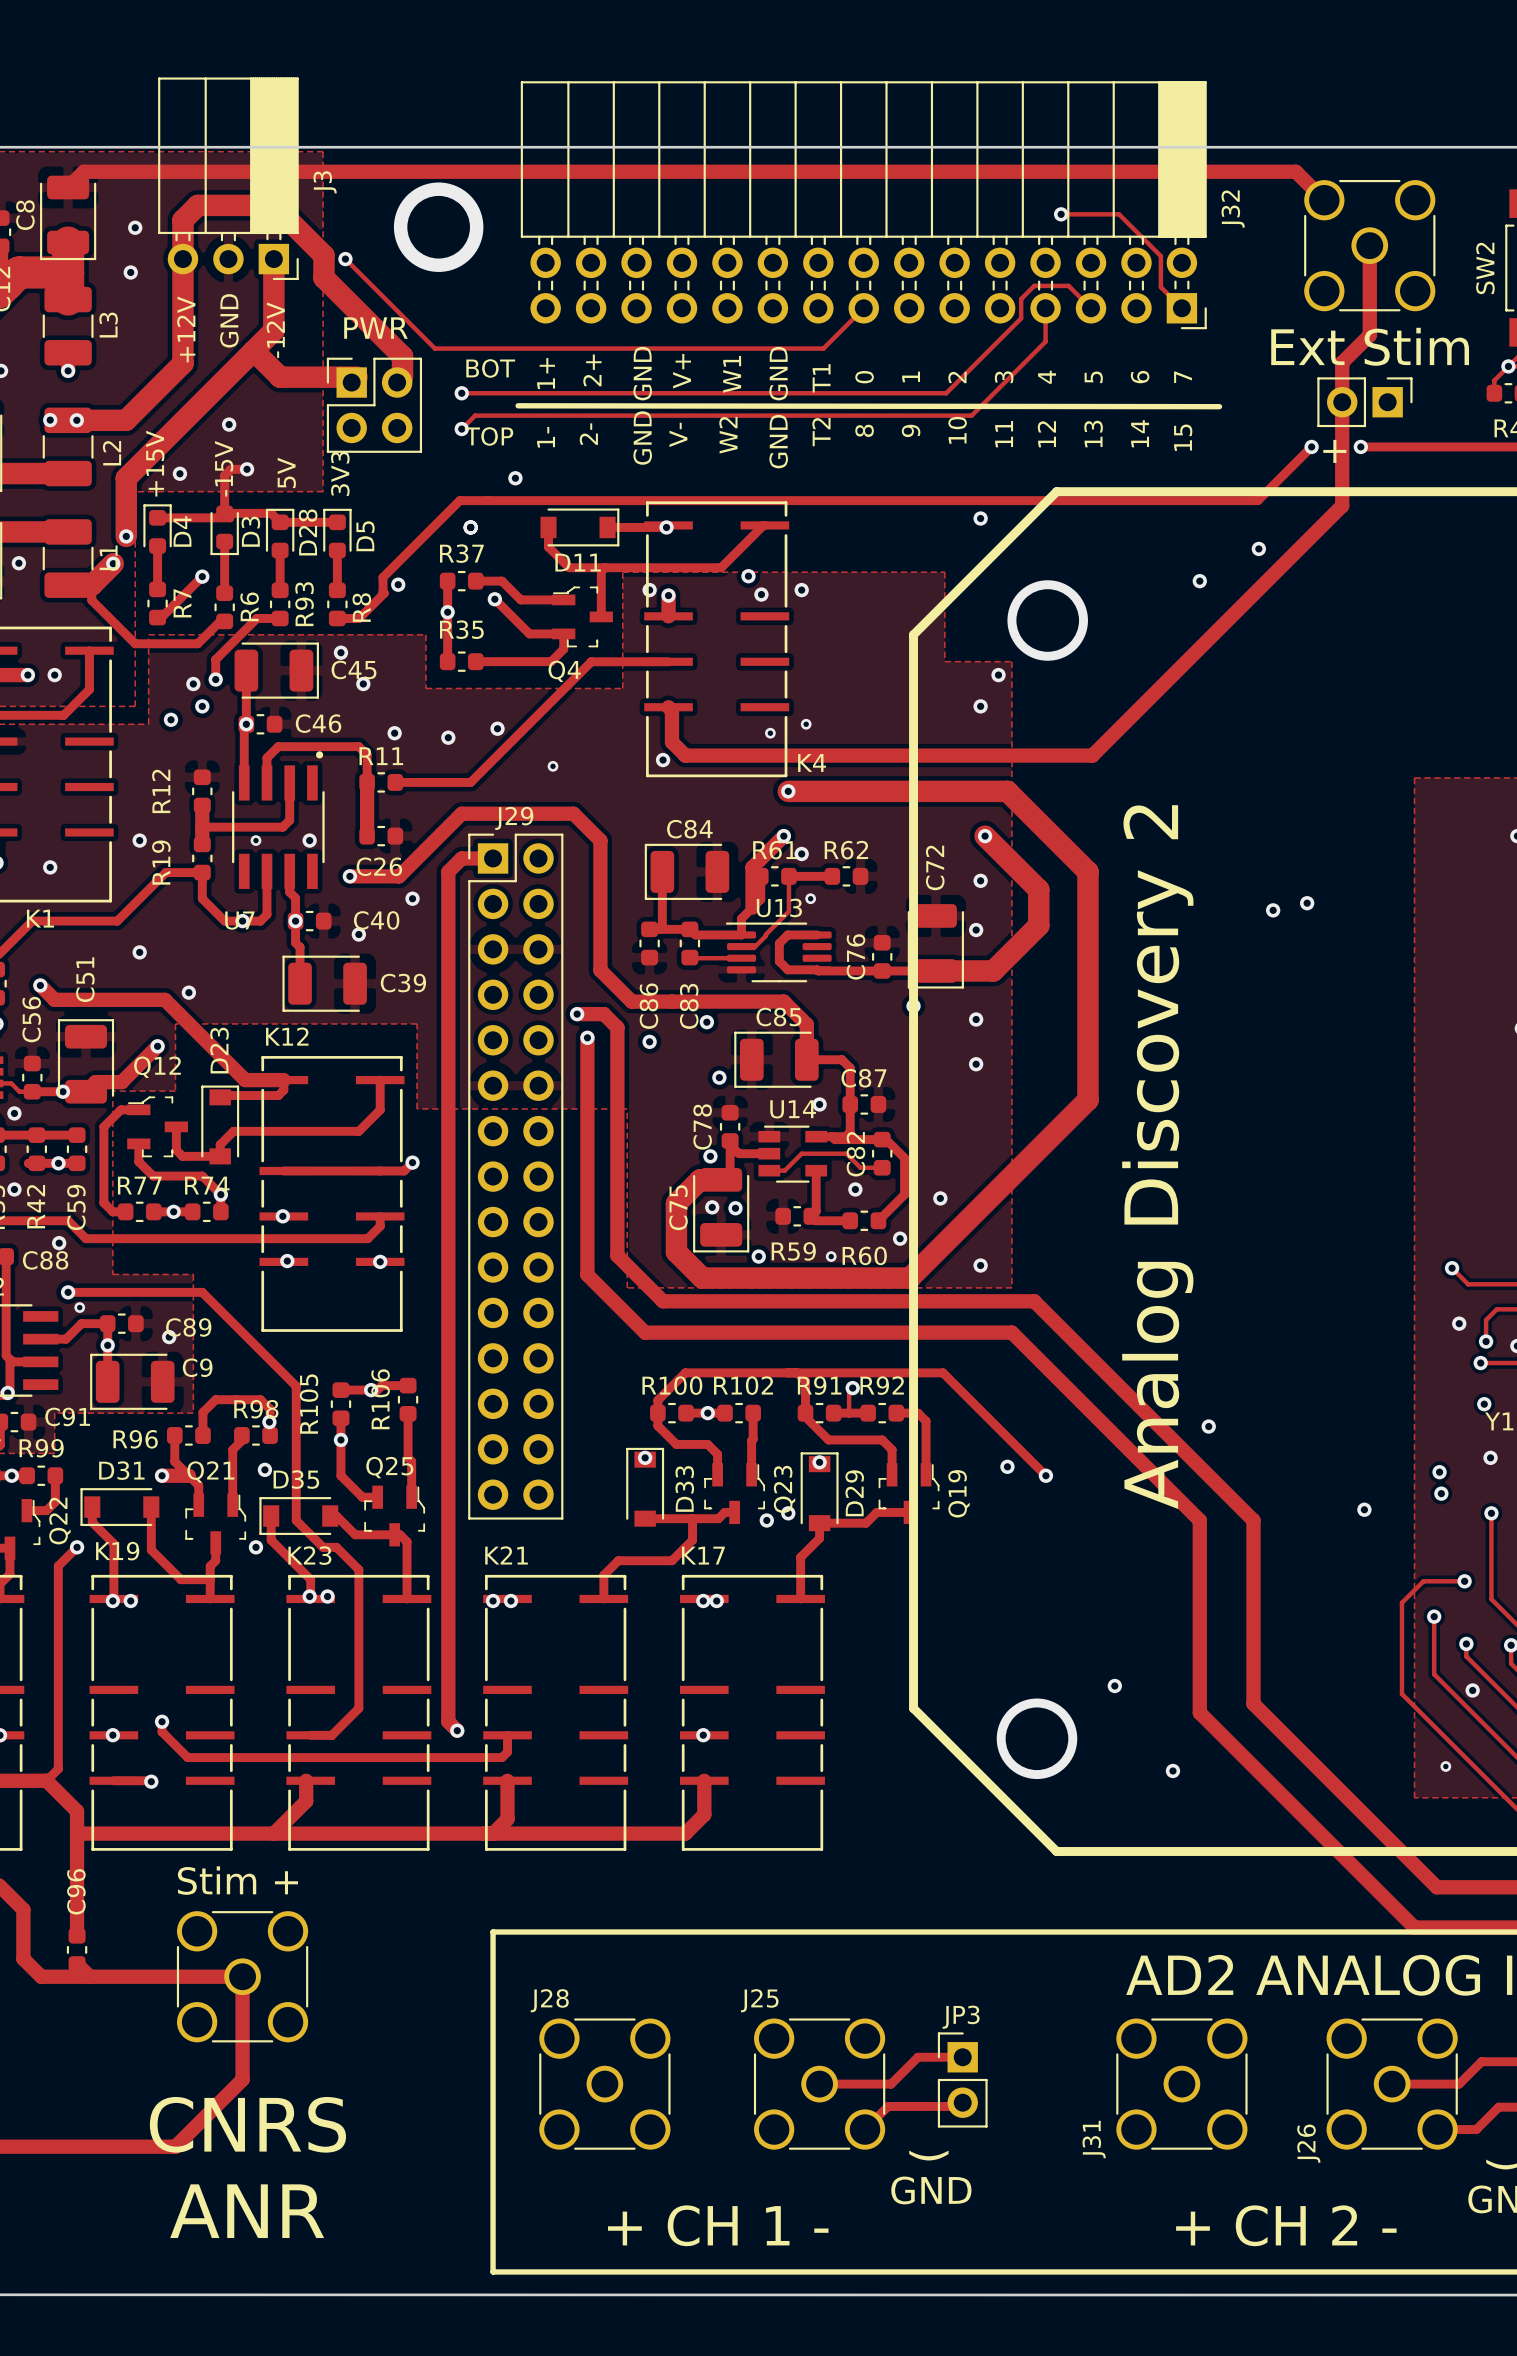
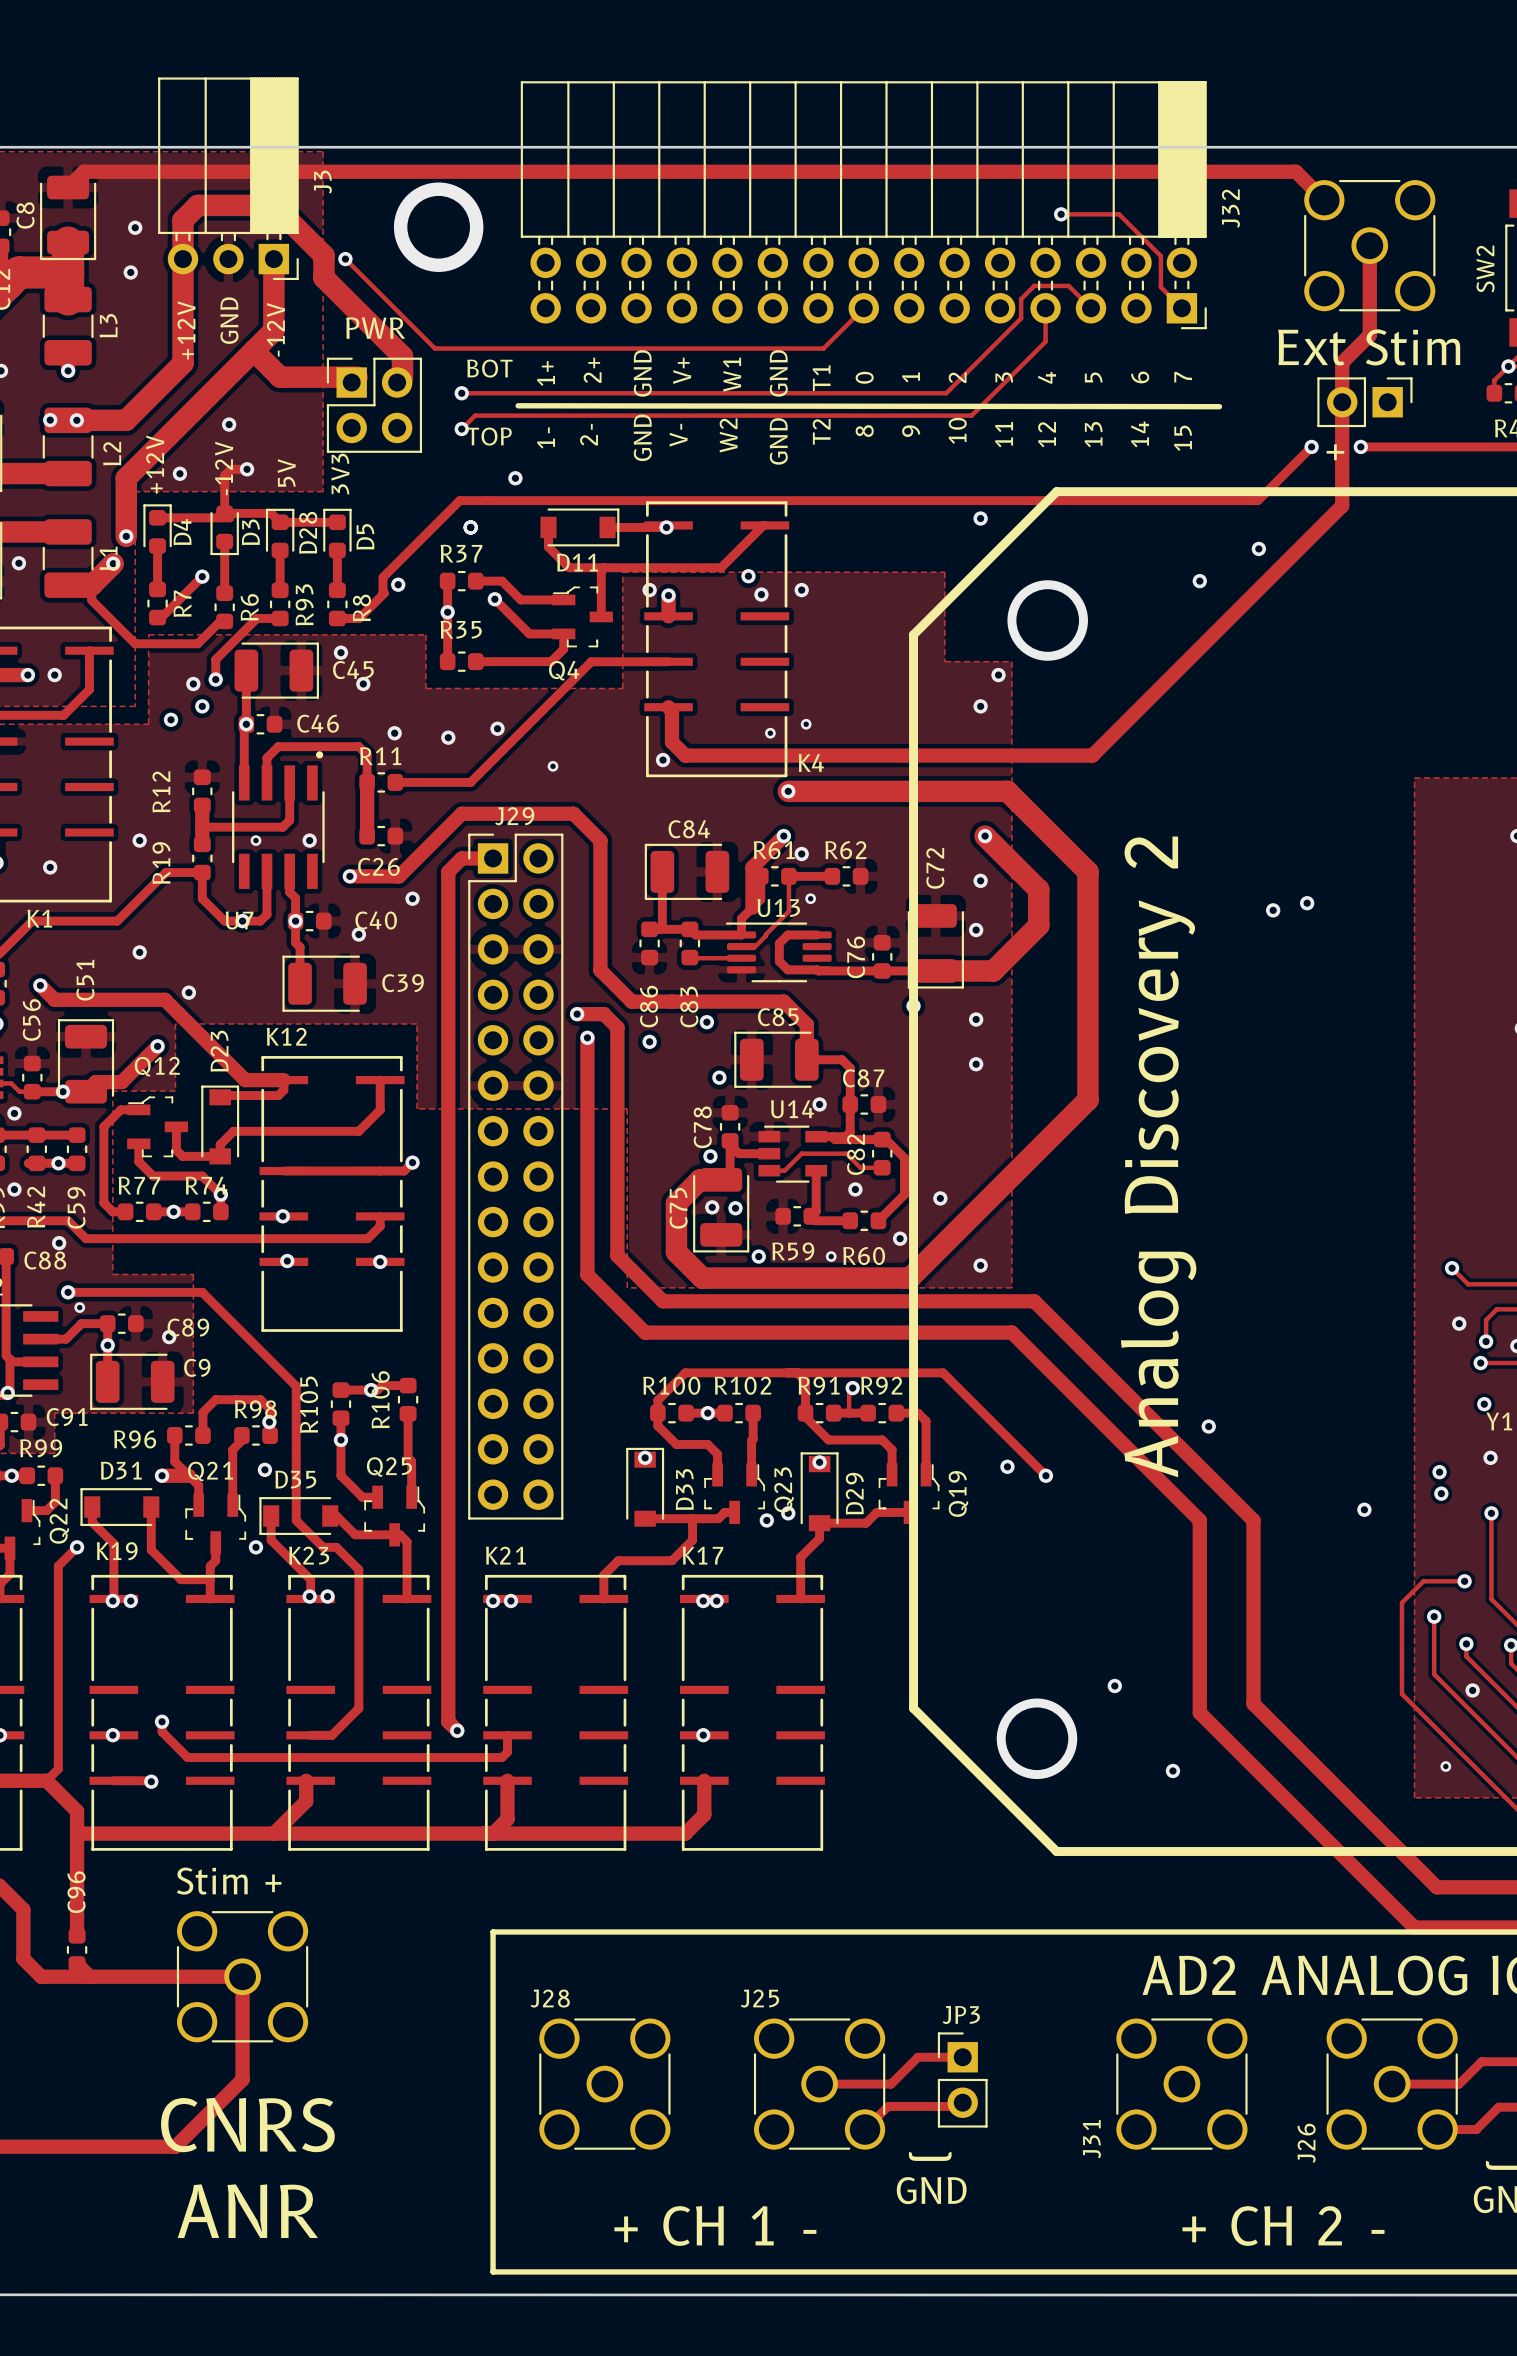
text: +15V (155, 463) -> +12V (155, 464)
text: -15V (224, 468) -> -12V (224, 468)

